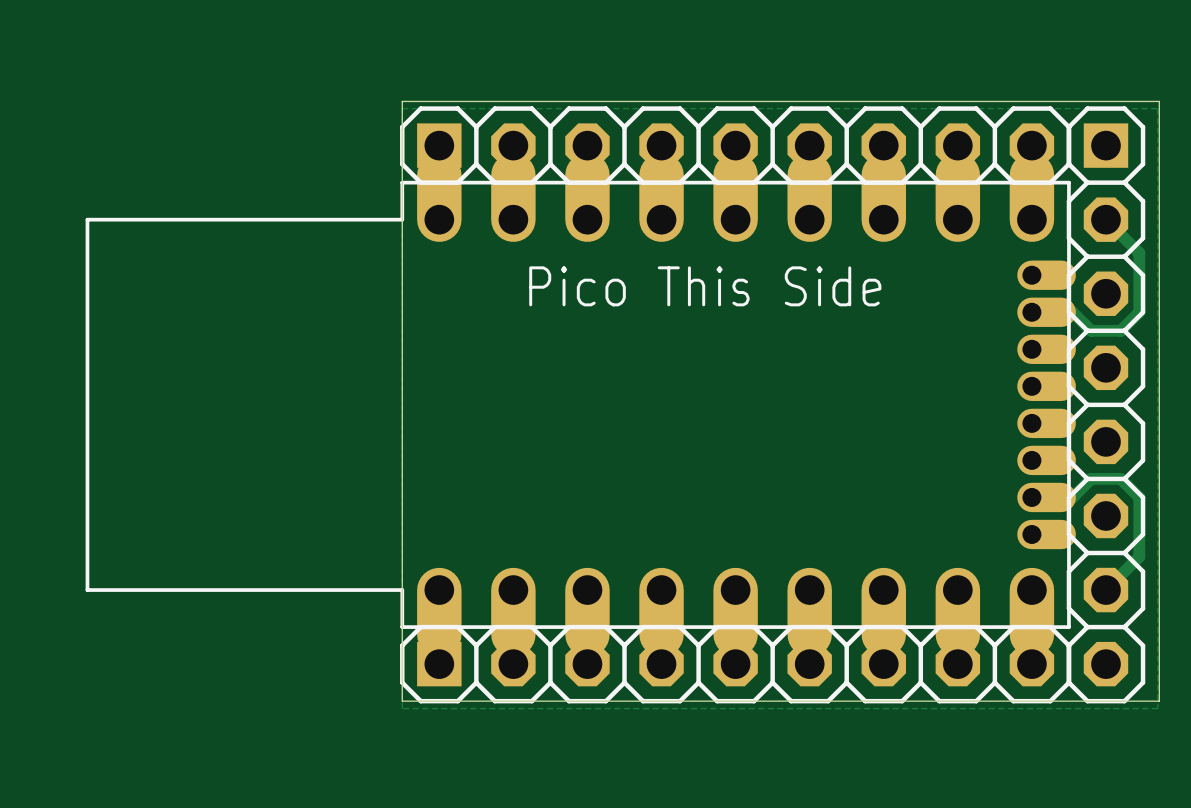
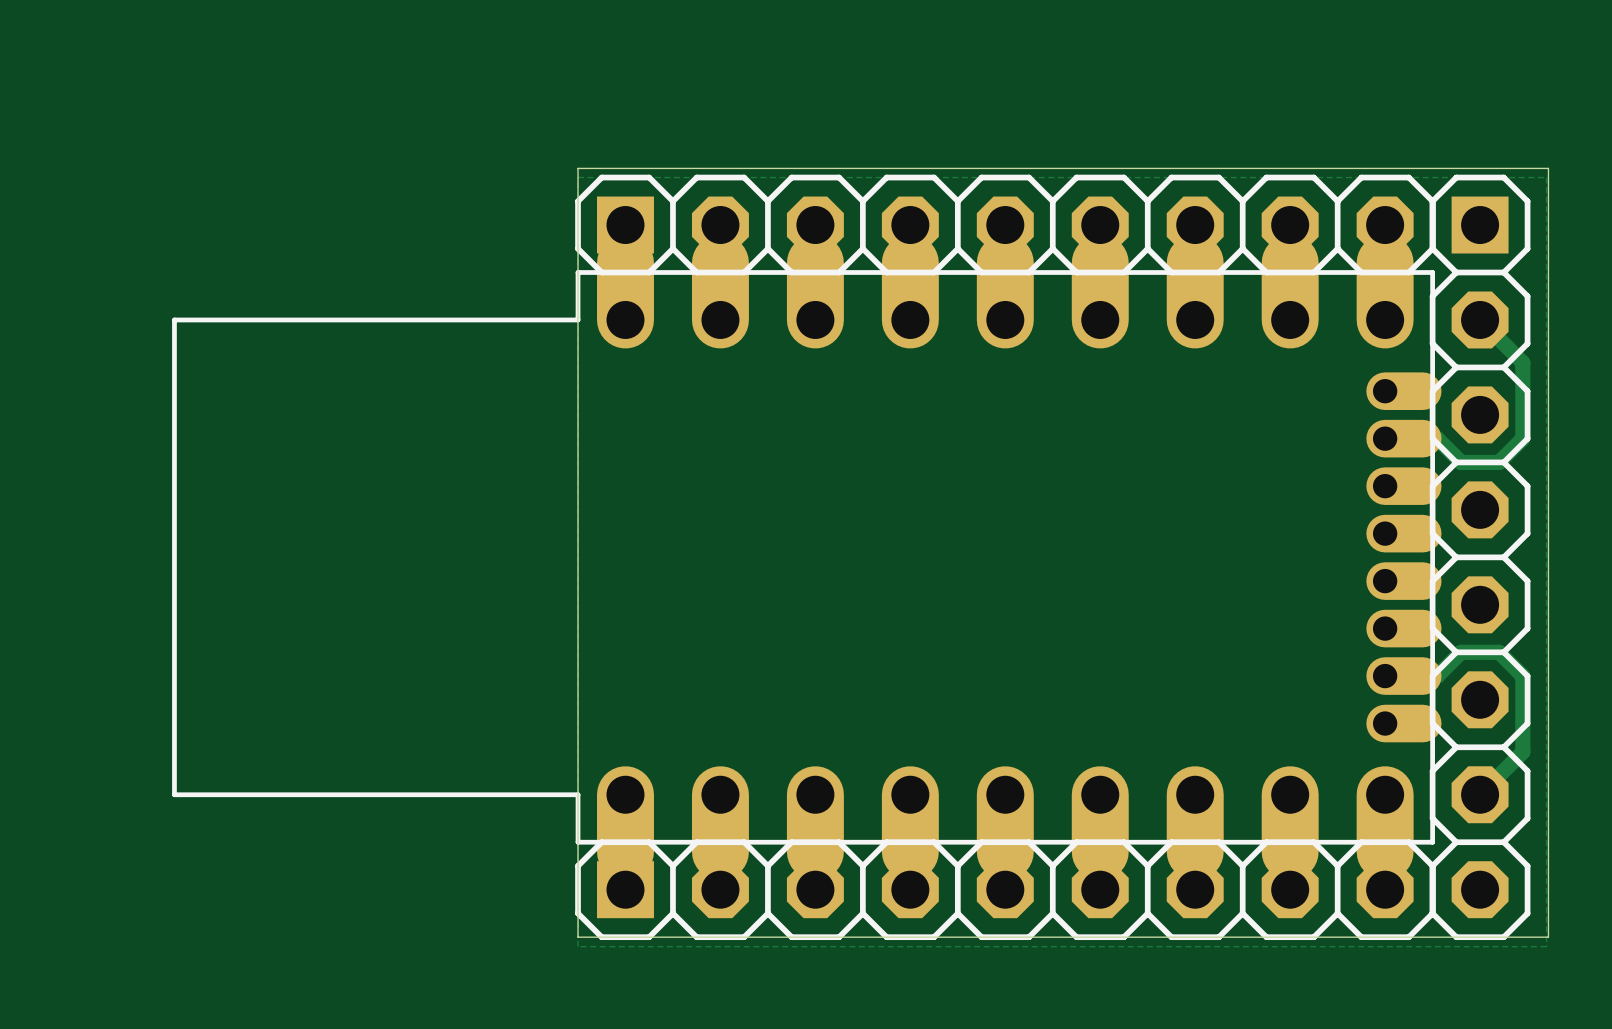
text: Pico This Side (705, 286) -> none

